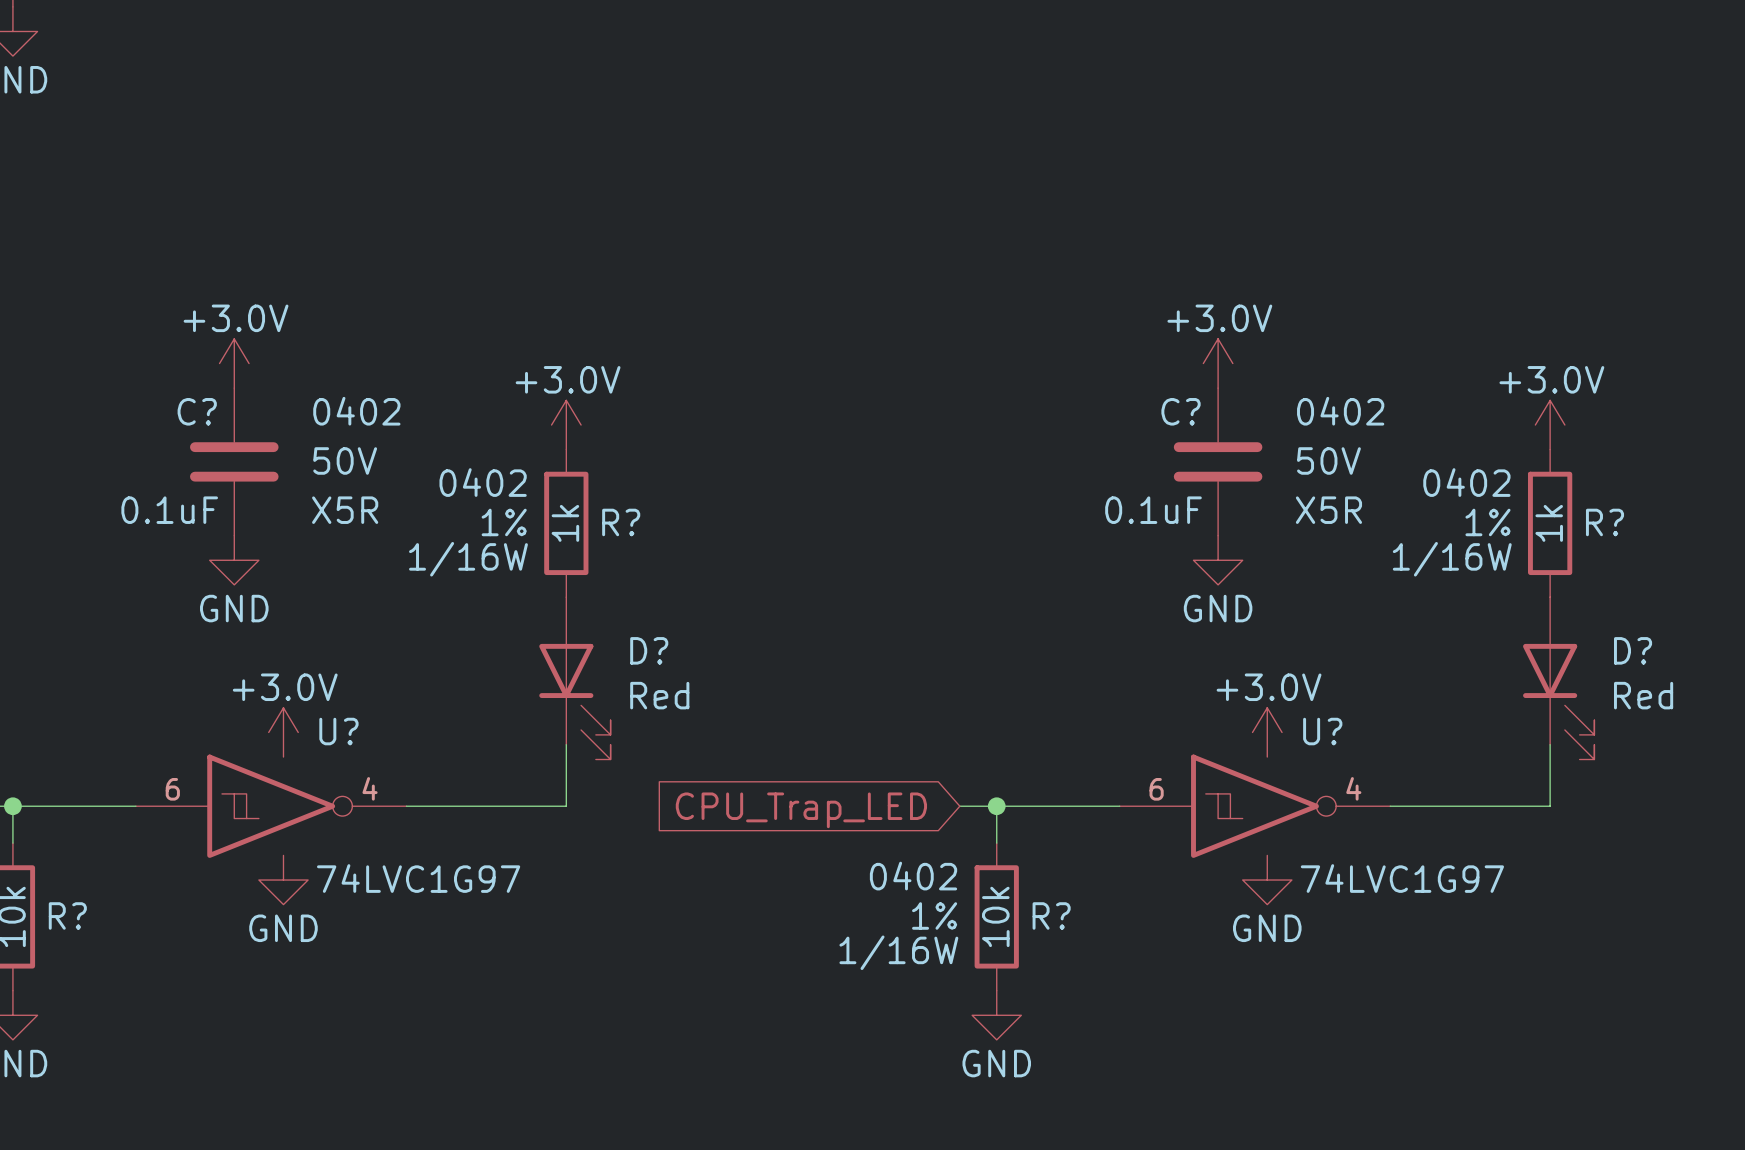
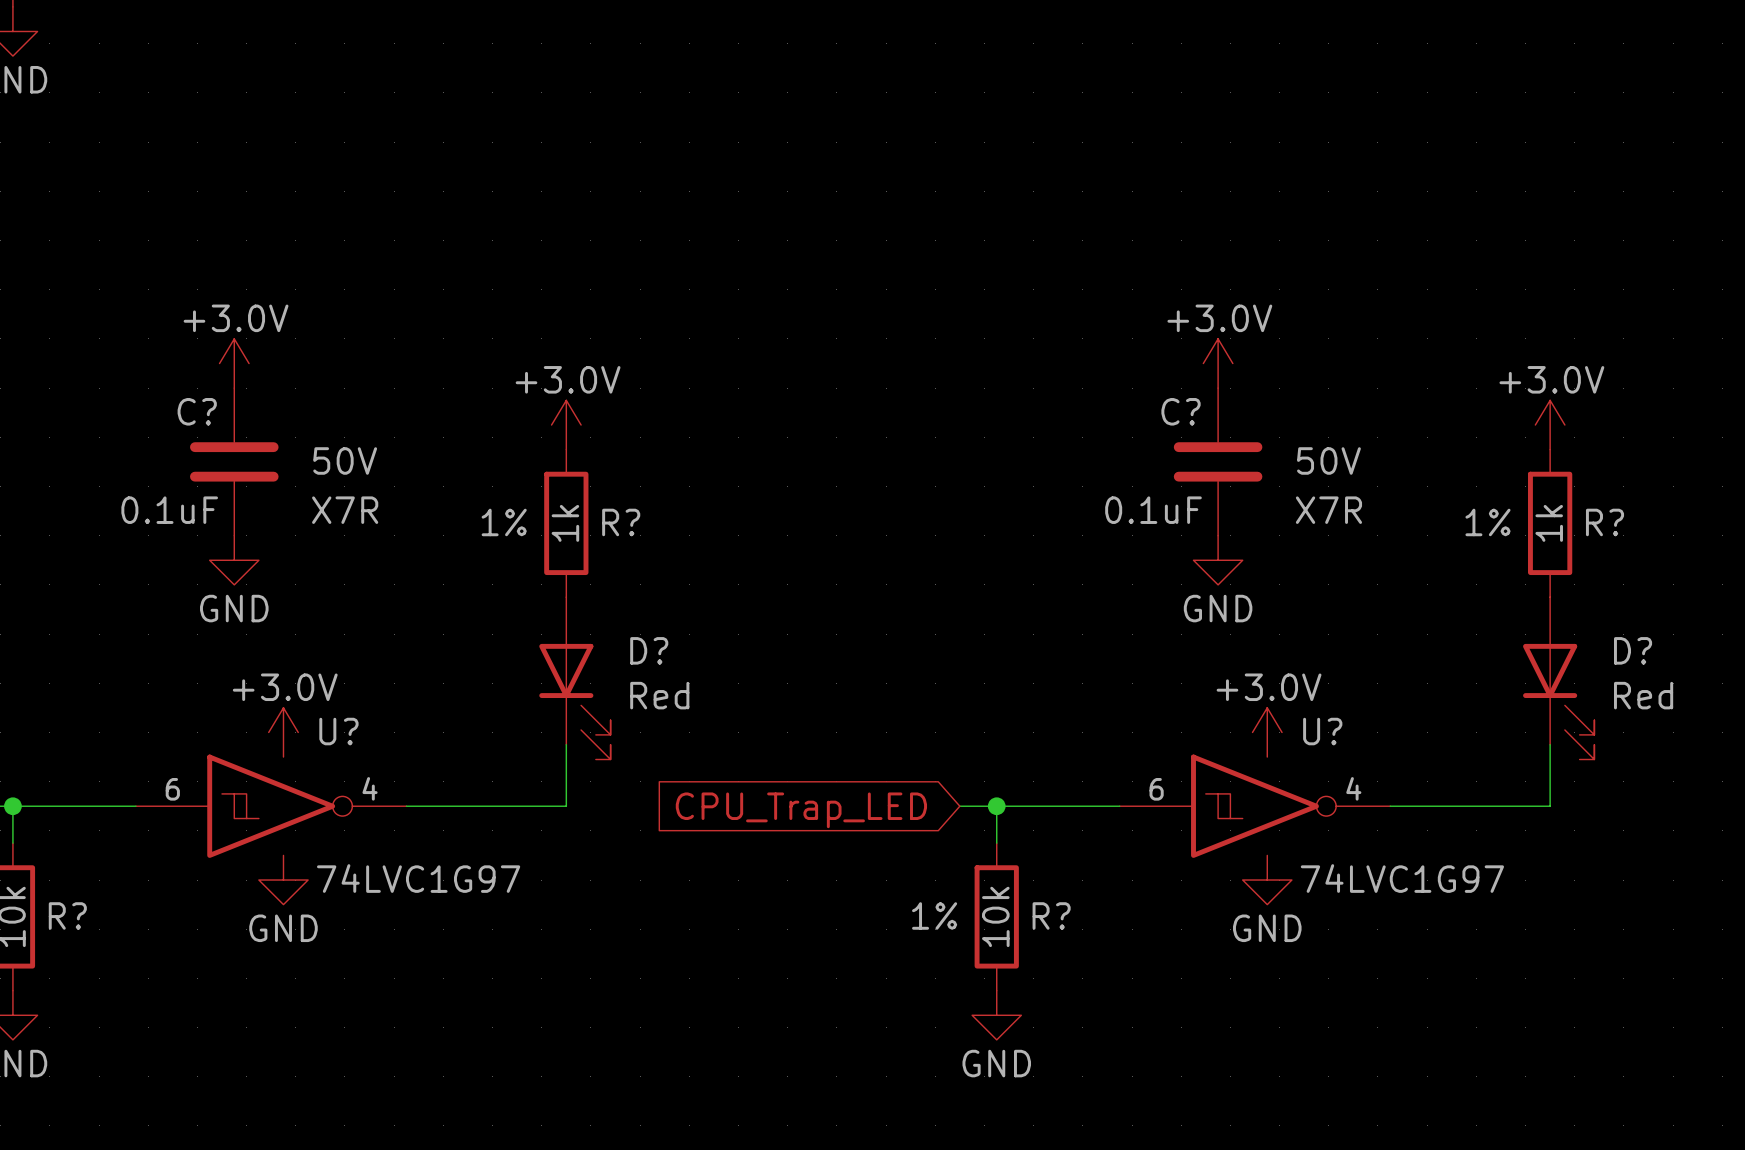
C? text: 0402 (356, 411) -> none
C? text: 0402 (1340, 411) -> none
R? text: 0402 (483, 482) -> none
R? text: 0402 (1466, 482) -> none
C? text: X5R (345, 510) -> X7R (345, 510)
C? text: X5R (1328, 510) -> X7R (1328, 510)
R? text: 1/16W (468, 559) -> none
R? text: 1/16W (1452, 559) -> none
R? text: 0402 (913, 876) -> none
R? text: 1/16W (898, 952) -> none

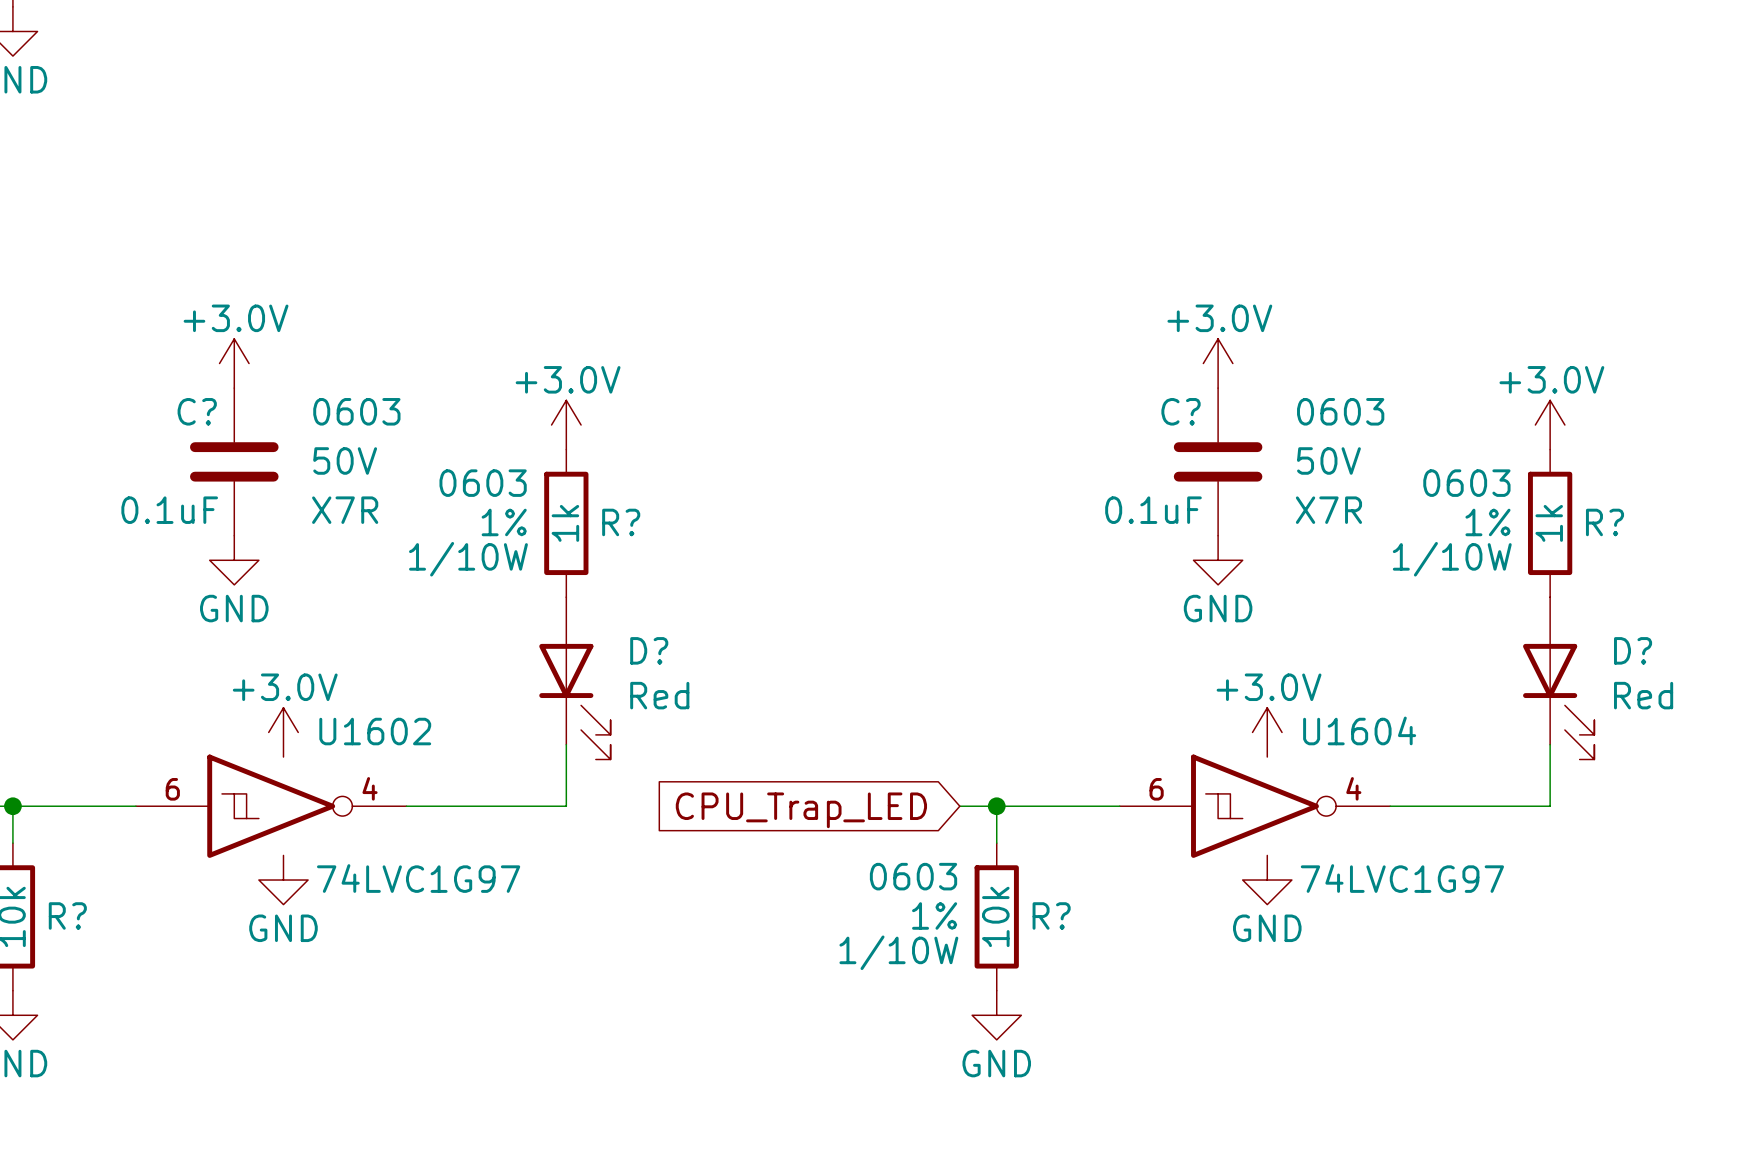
C? text: none -> 0603 (356, 411)
C? text: none -> 0603 (1340, 411)
R? text: none -> 0603 (483, 483)
R? text: none -> 0603 (1466, 483)
R? text: none -> 1/10W (468, 559)
R? text: none -> 1/10W (1452, 559)
U? name: U? (338, 731) -> U1602 (375, 731)
U? name: U? (1322, 731) -> U1604 (1359, 730)
R? text: none -> 0603 (913, 876)
R? text: none -> 1/10W (898, 952)

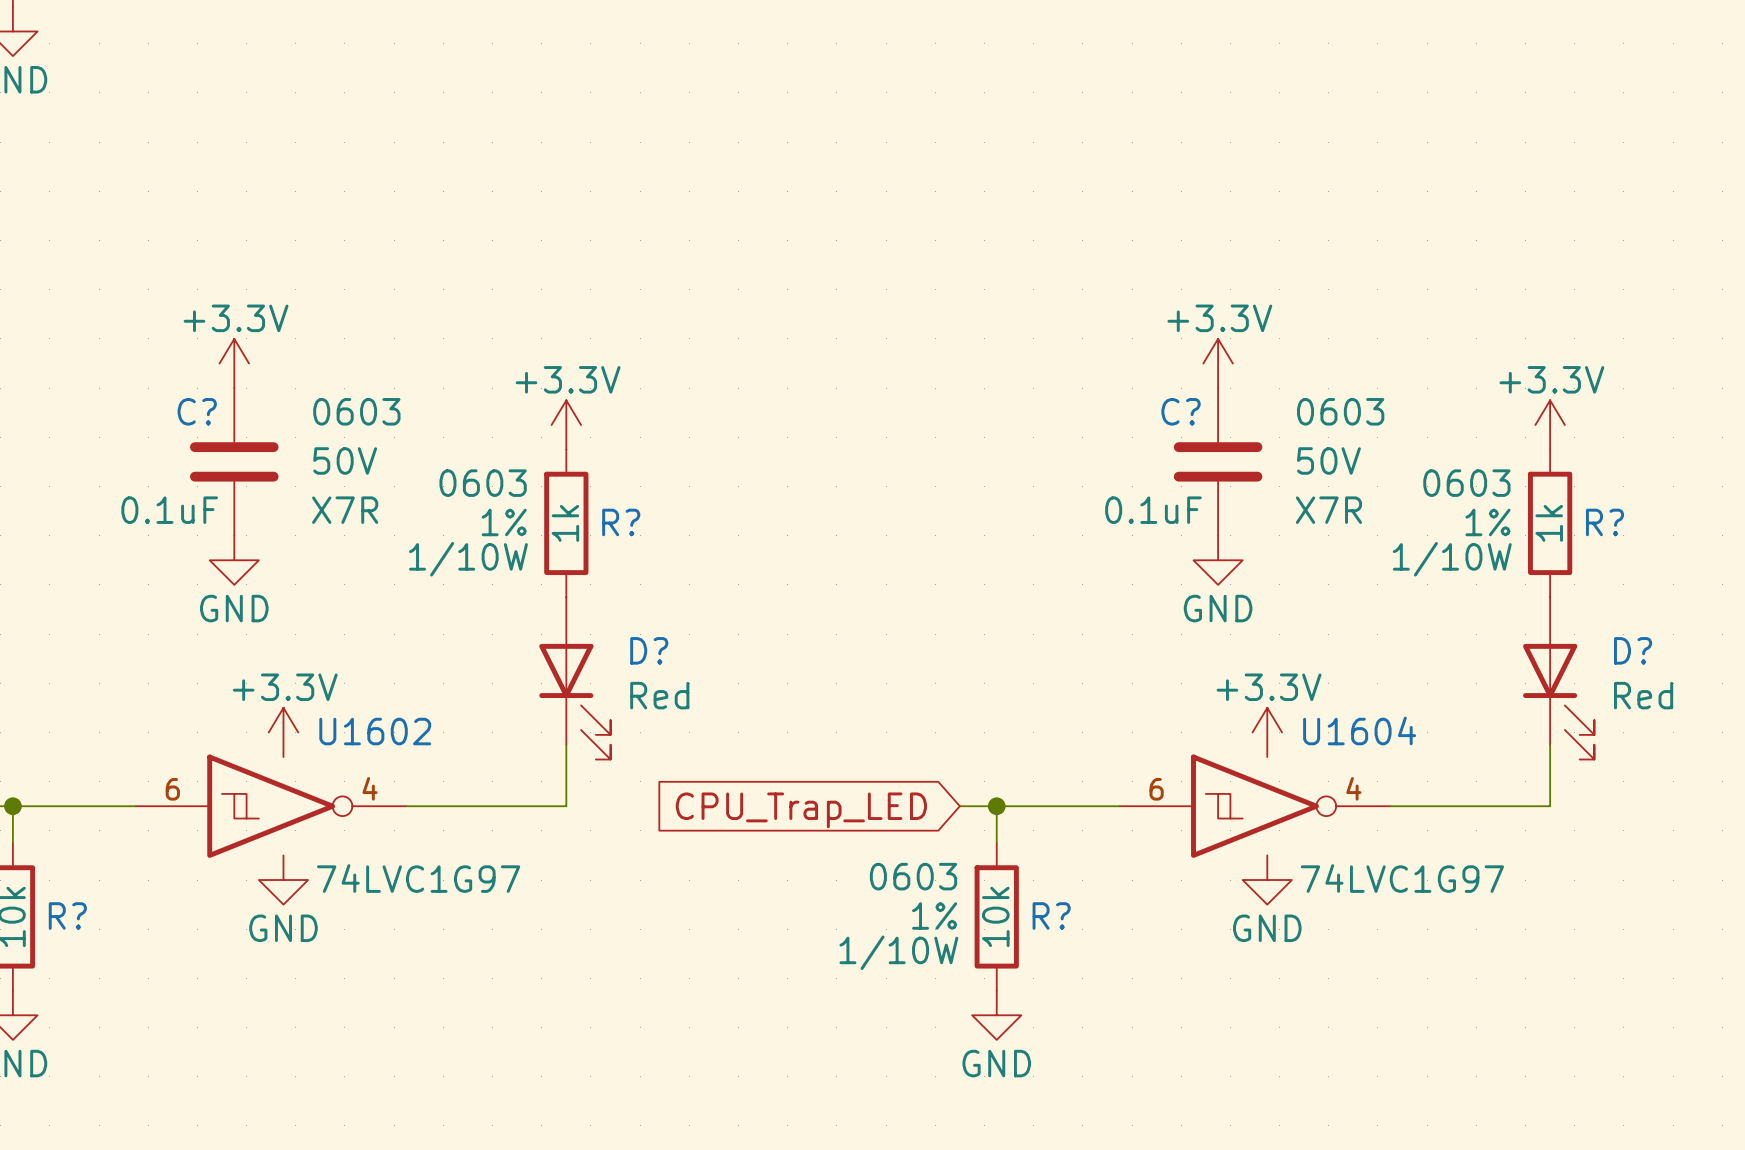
power symbol: +3.0V (234, 363) -> +3.3V (234, 363)
power symbol: +3.0V (1218, 363) -> +3.3V (1218, 363)
power symbol: +3.0V (566, 425) -> +3.3V (566, 425)
power symbol: +3.0V (1550, 425) -> +3.3V (1550, 425)
power symbol: +3.0V (283, 732) -> +3.3V (283, 732)
power symbol: +3.0V (1267, 732) -> +3.3V (1267, 732)

